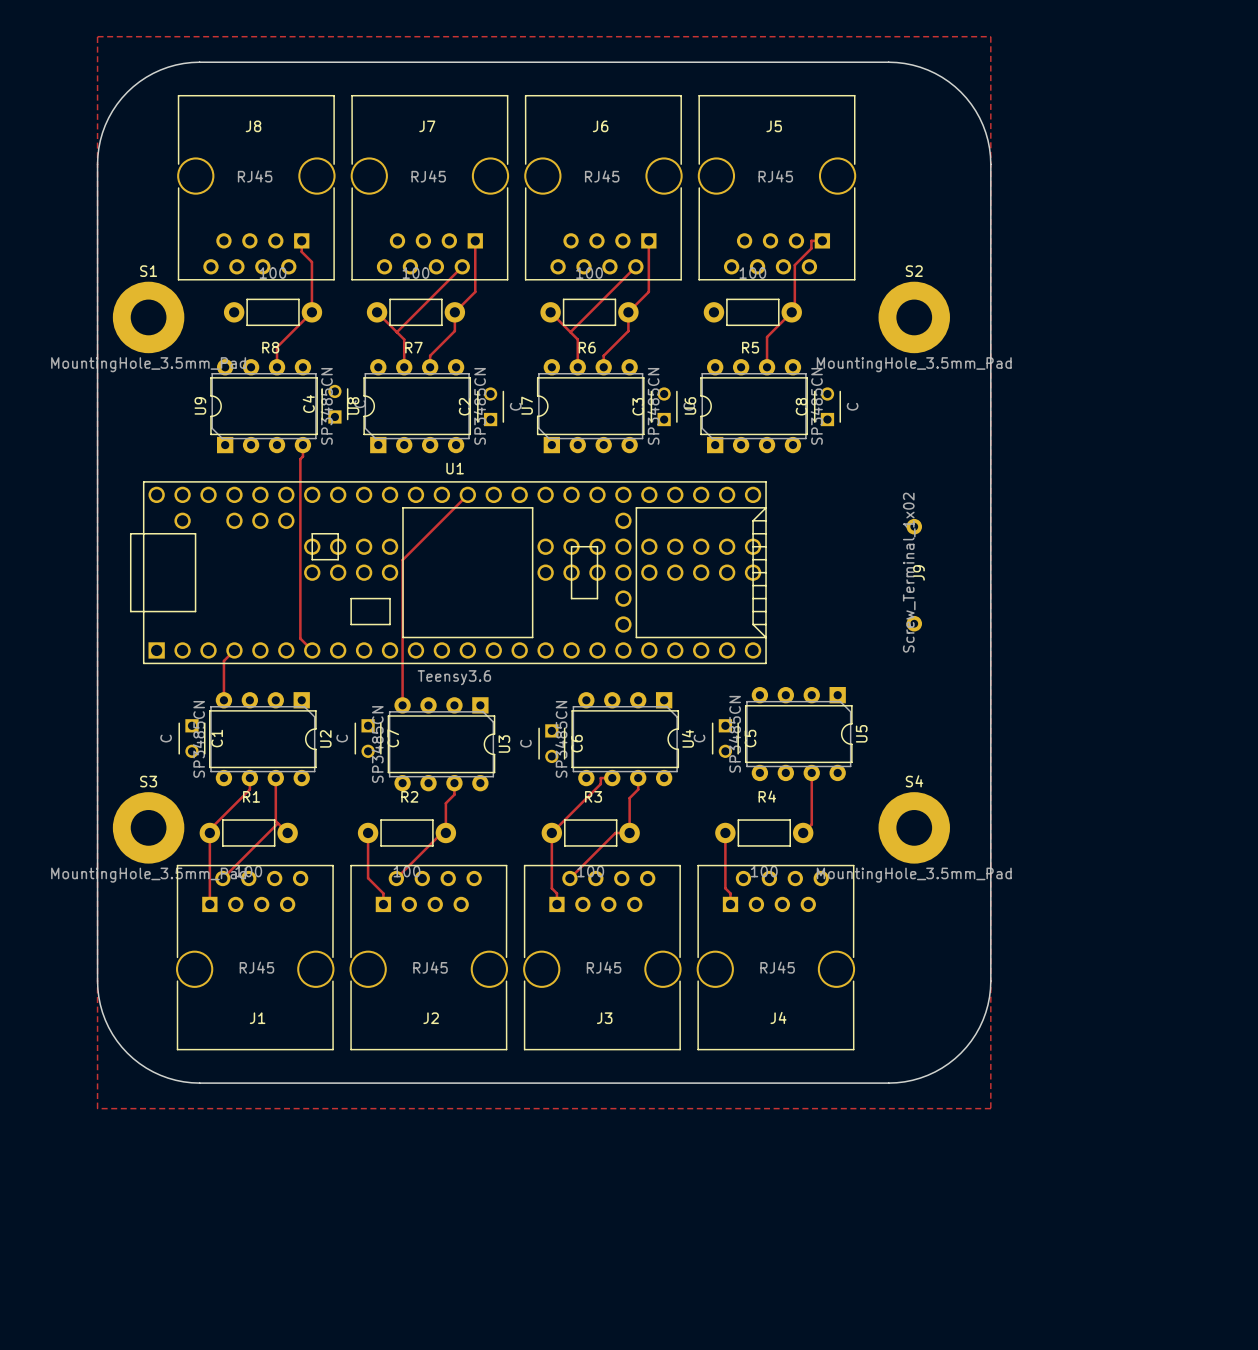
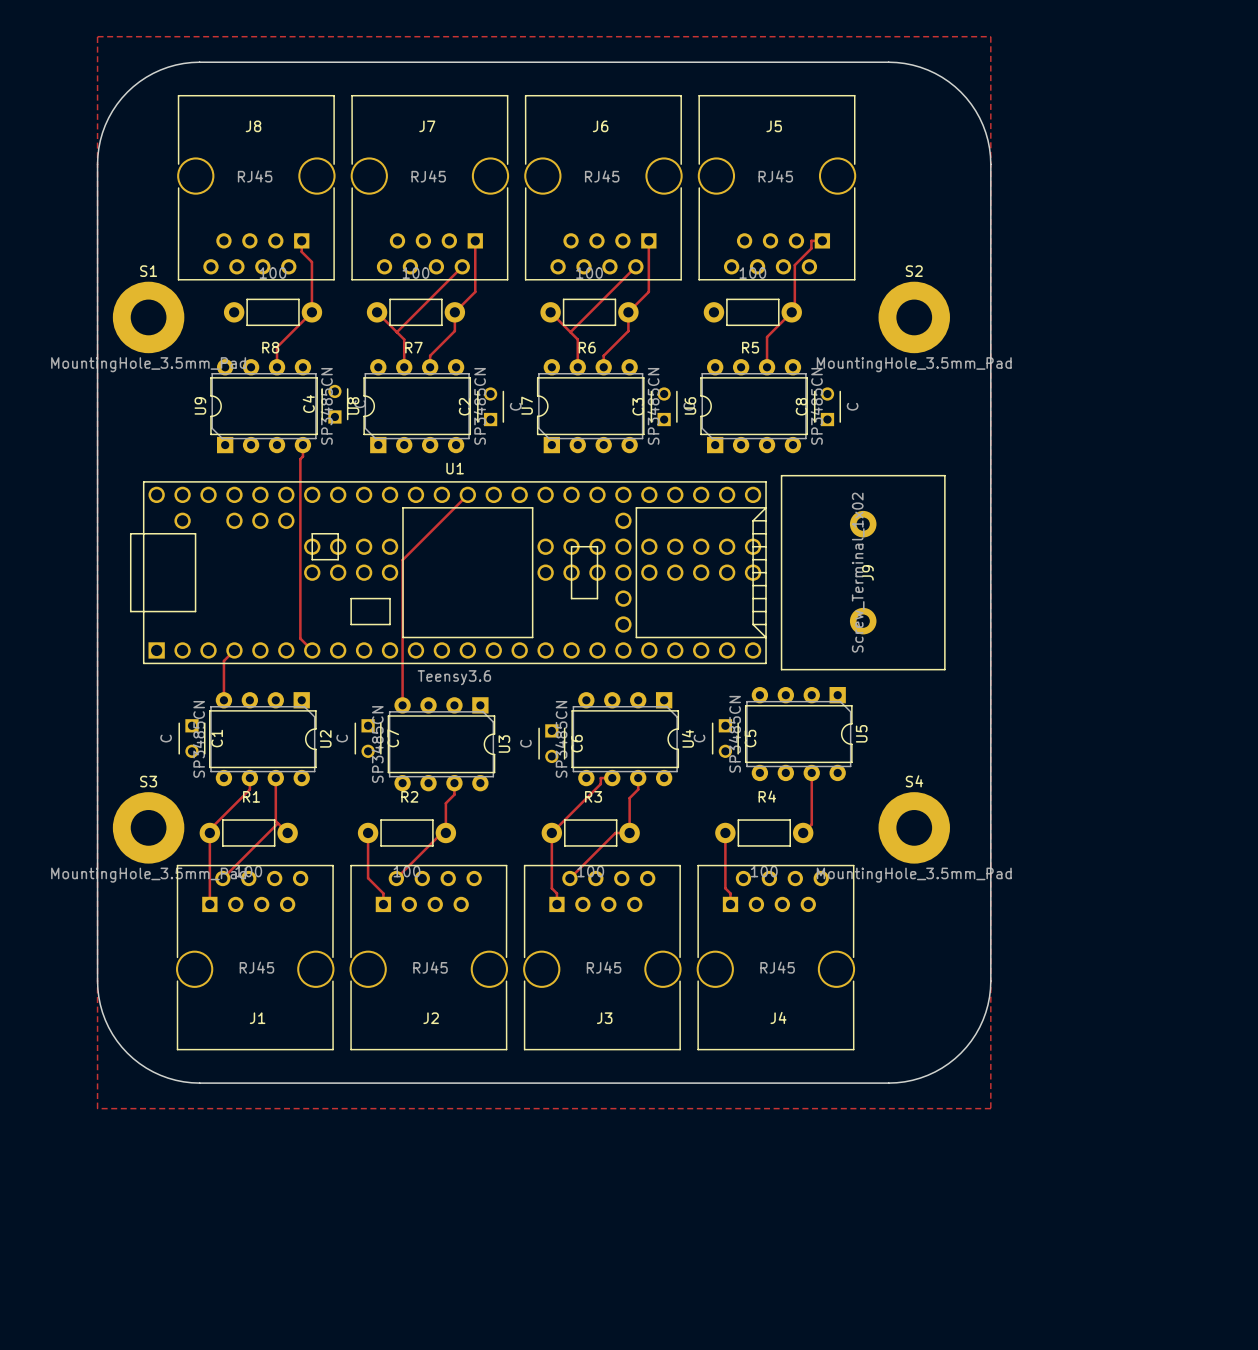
J9 footprint: [906, 518, 923, 632] -> [780, 474, 946, 671]

